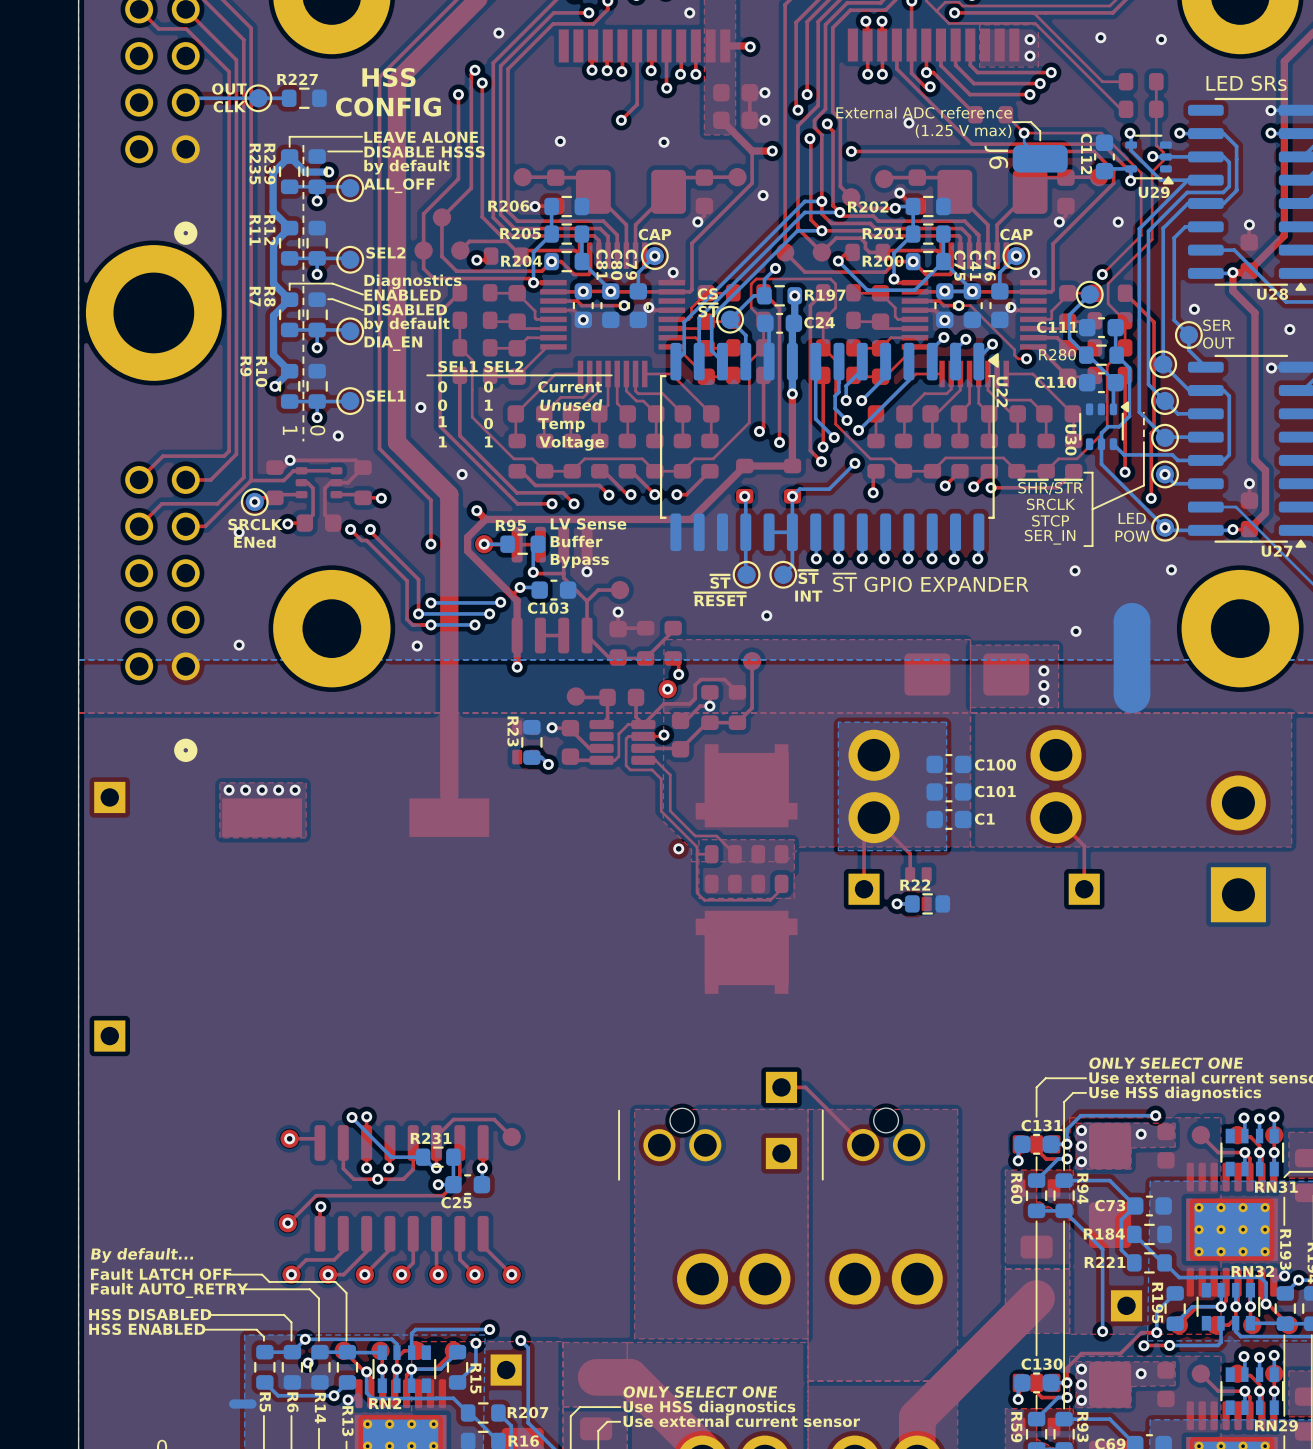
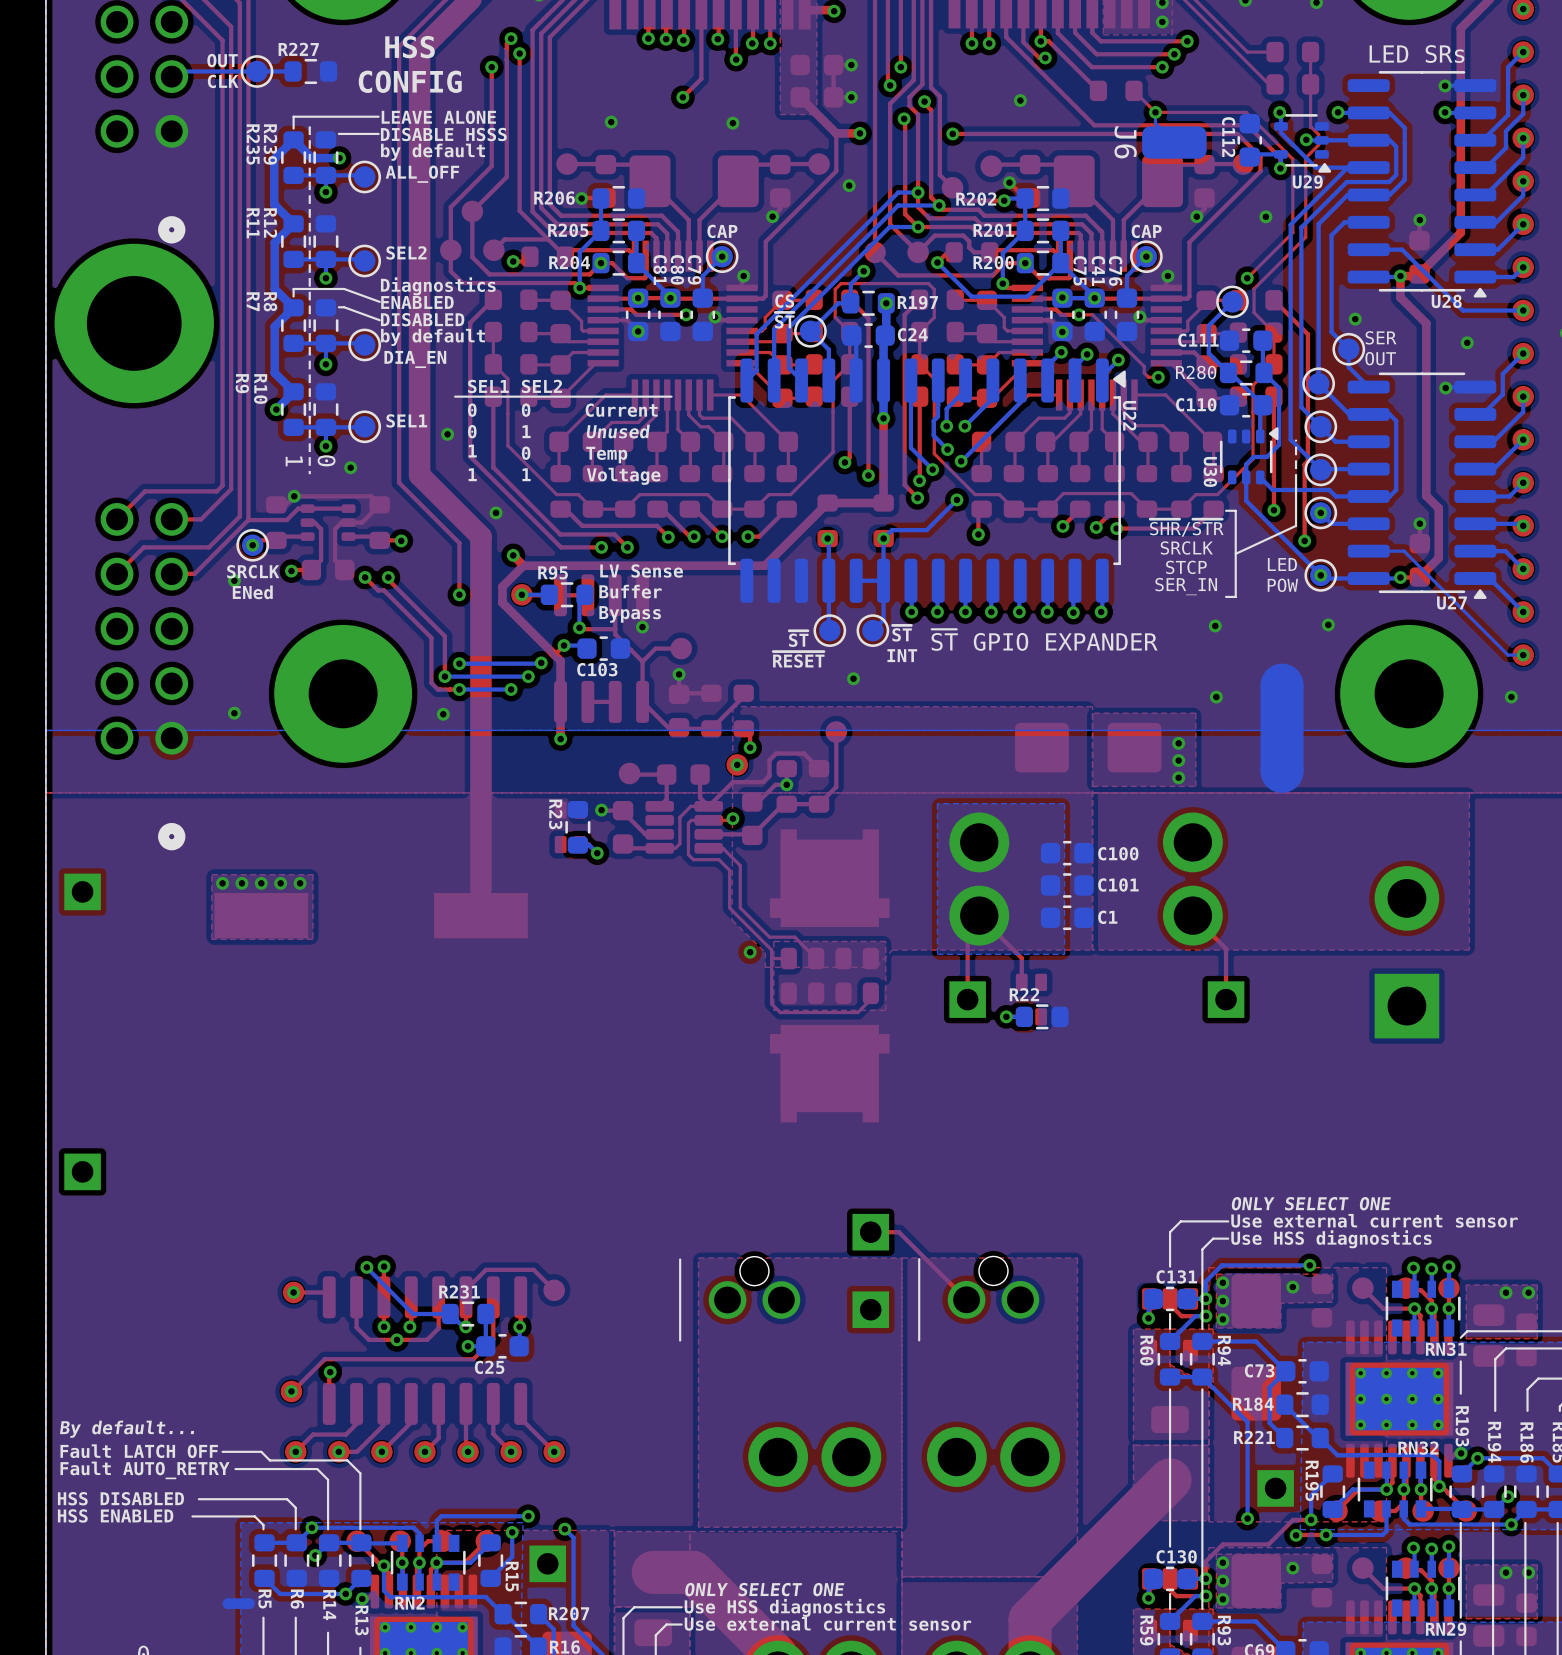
text: External ADC reference (924, 112) -> none
line: (1012, 122) (1031, 122) (1040, 131) (1040, 140) -> none
text: (1.25 V max) (963, 131) -> none

